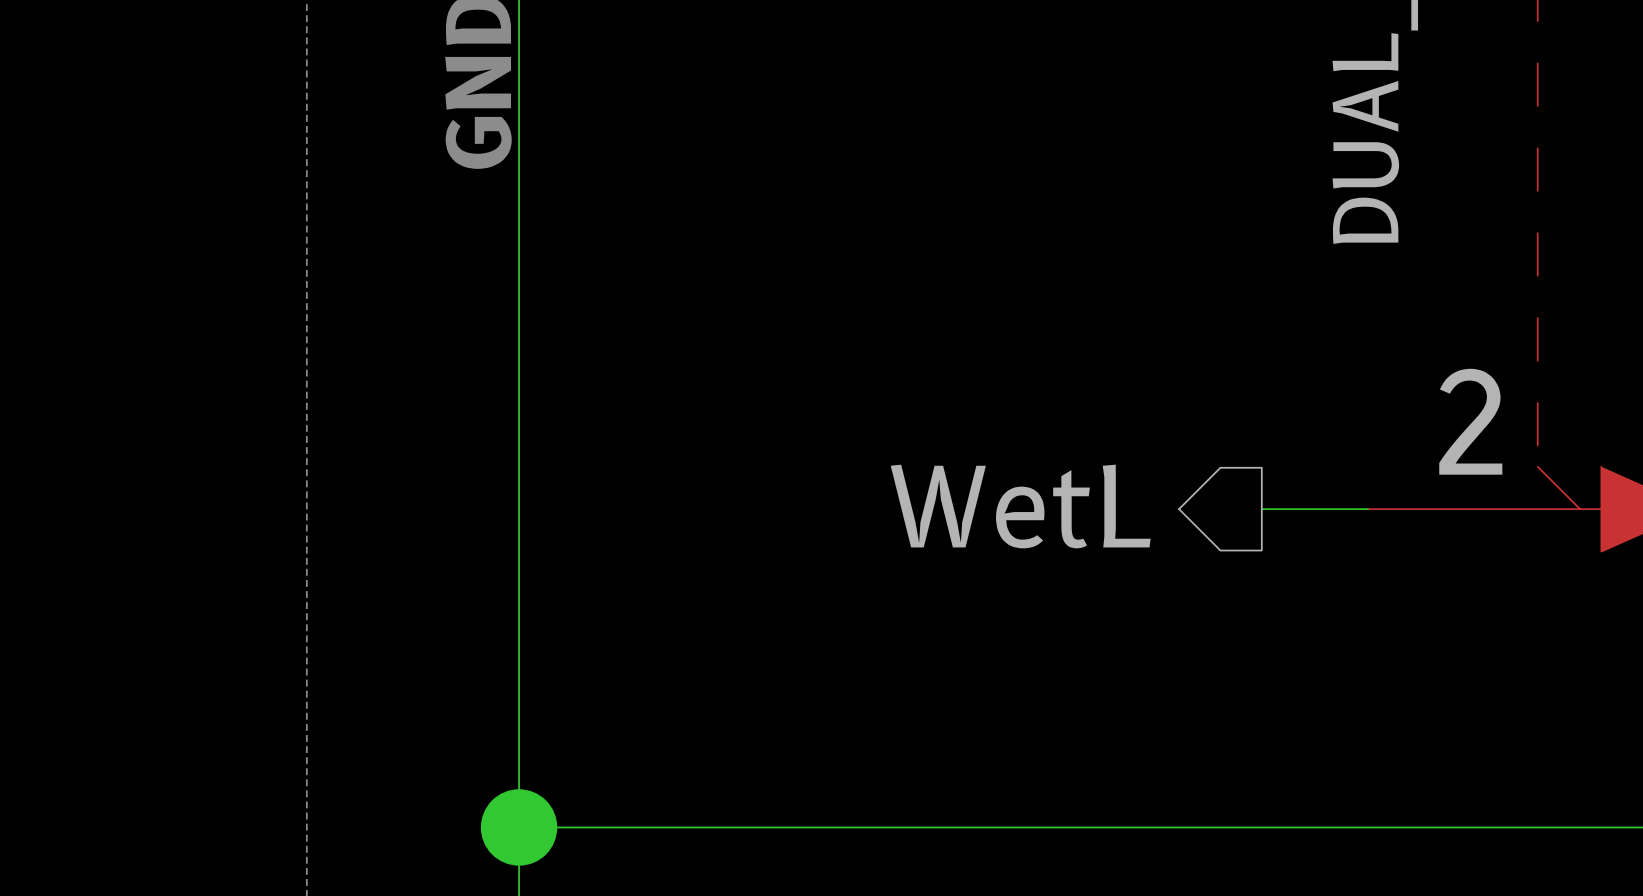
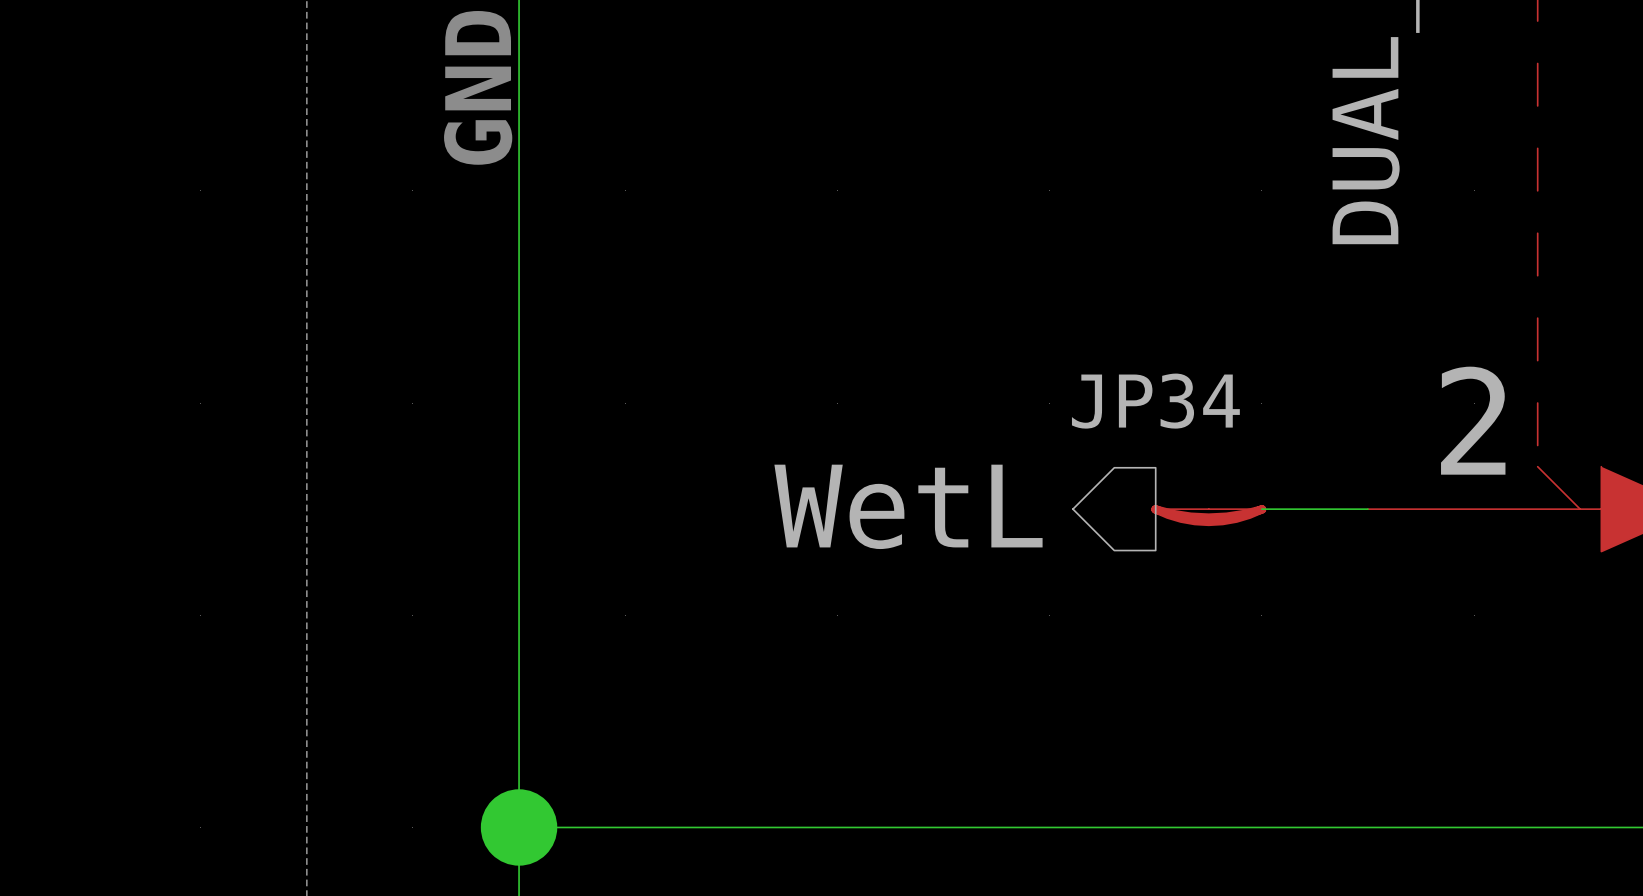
hierarchical label position: WetL (1020, 506) -> WetL (908, 506)
JP34: none -> (1208, 515)

